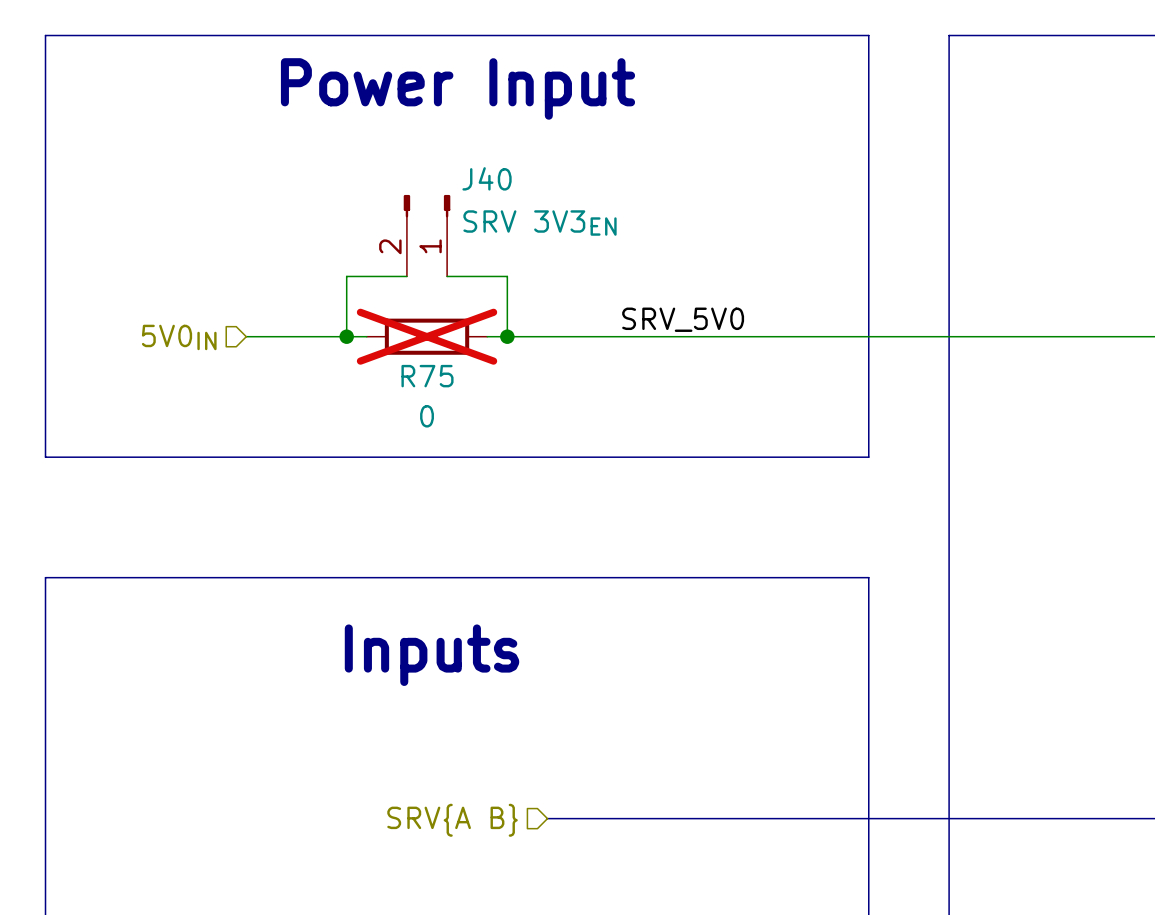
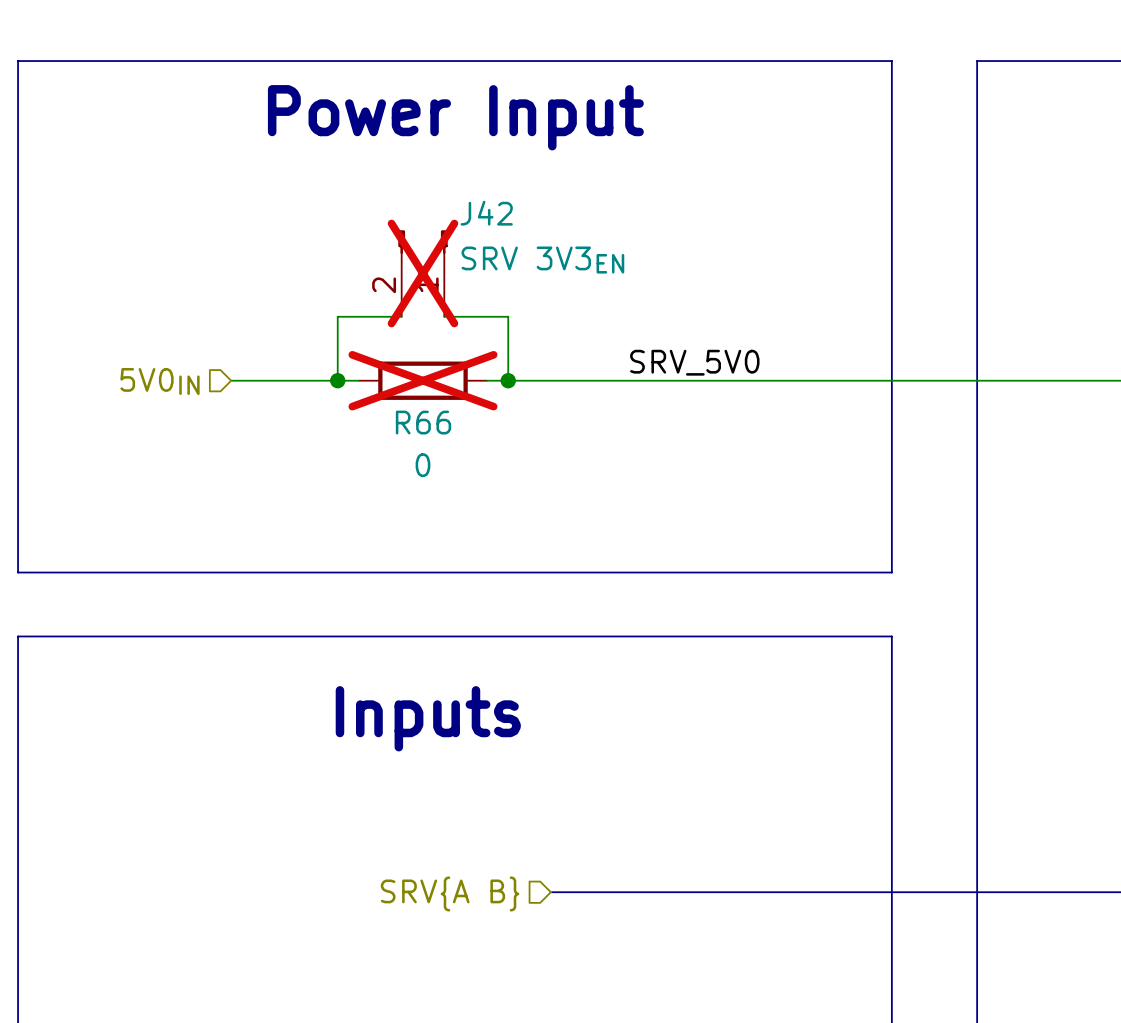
J40 name: J40 (487, 178) -> J42 (486, 213)
J40 do-not-place cross: none -> (422, 273)
R75 name: R75 (427, 376) -> R66 (423, 422)
line: (45, 457) (868, 457) -> (18, 508) (18, 572) (891, 572) (891, 508)

